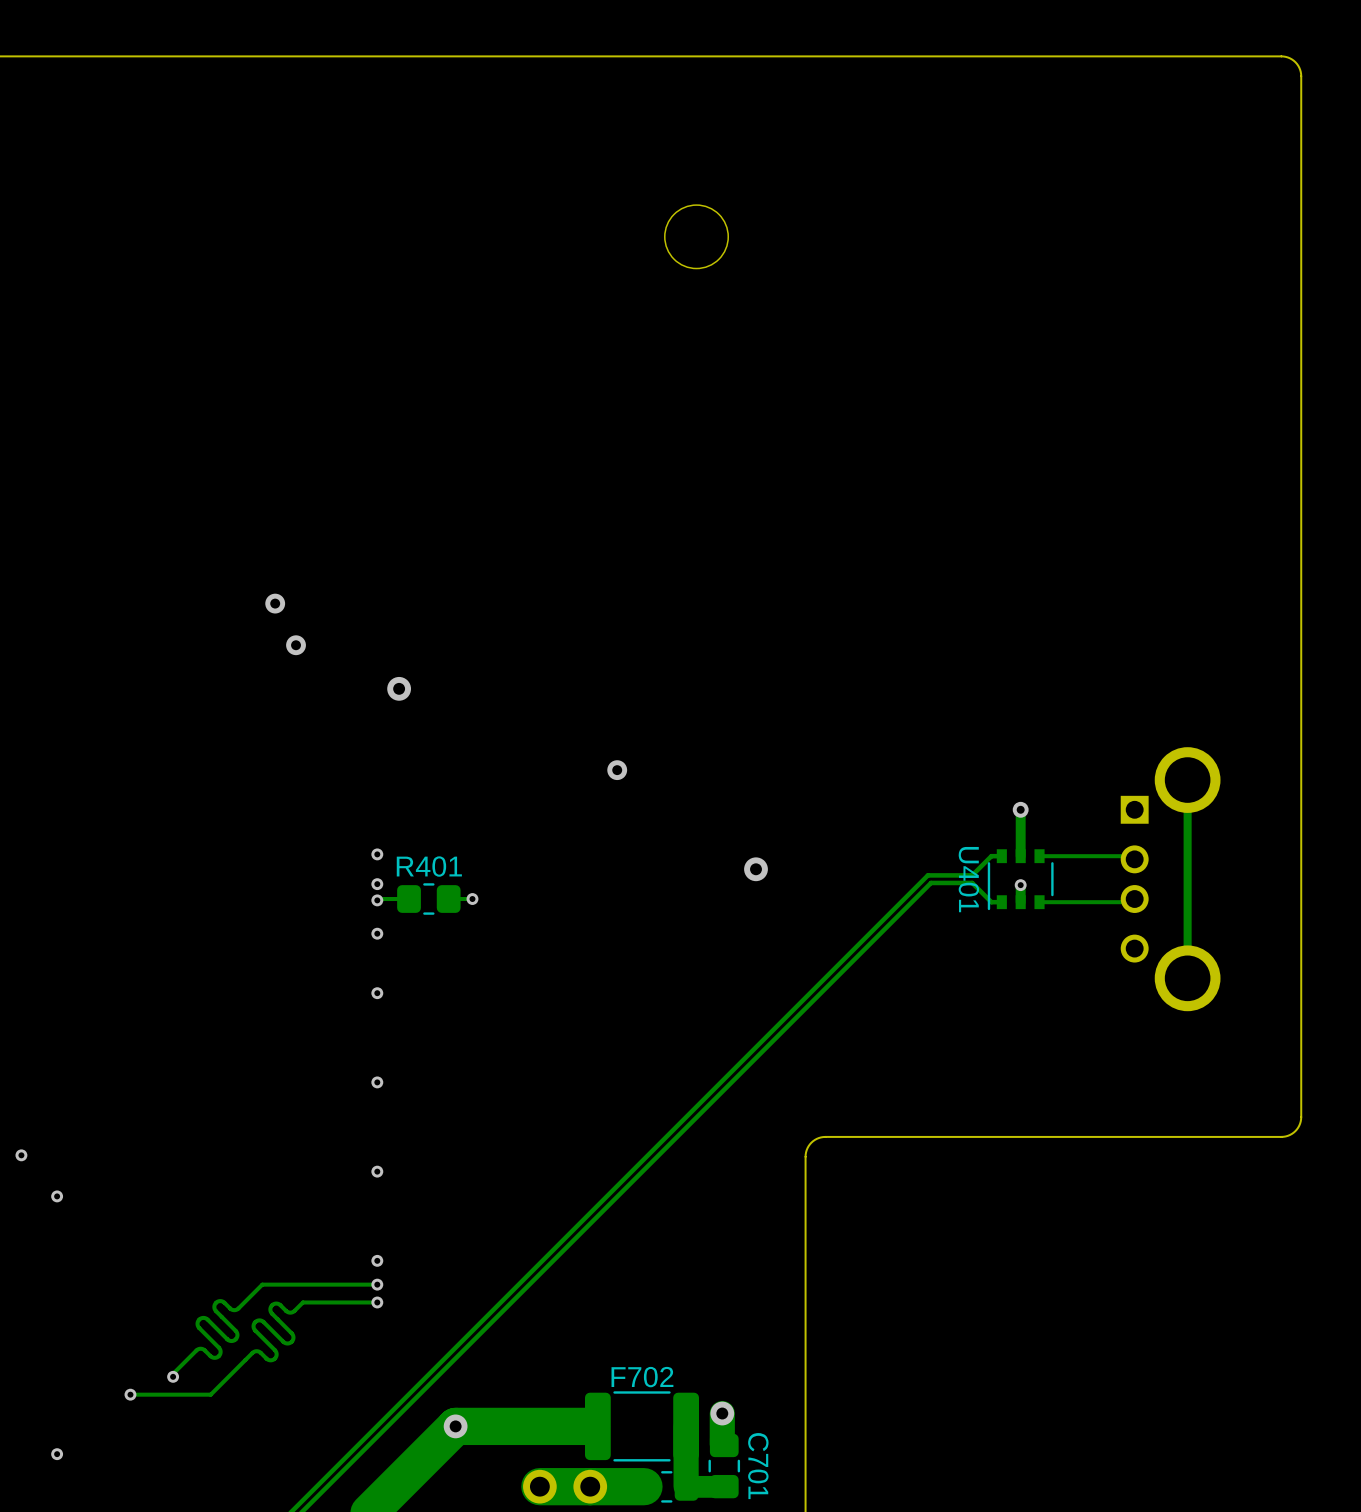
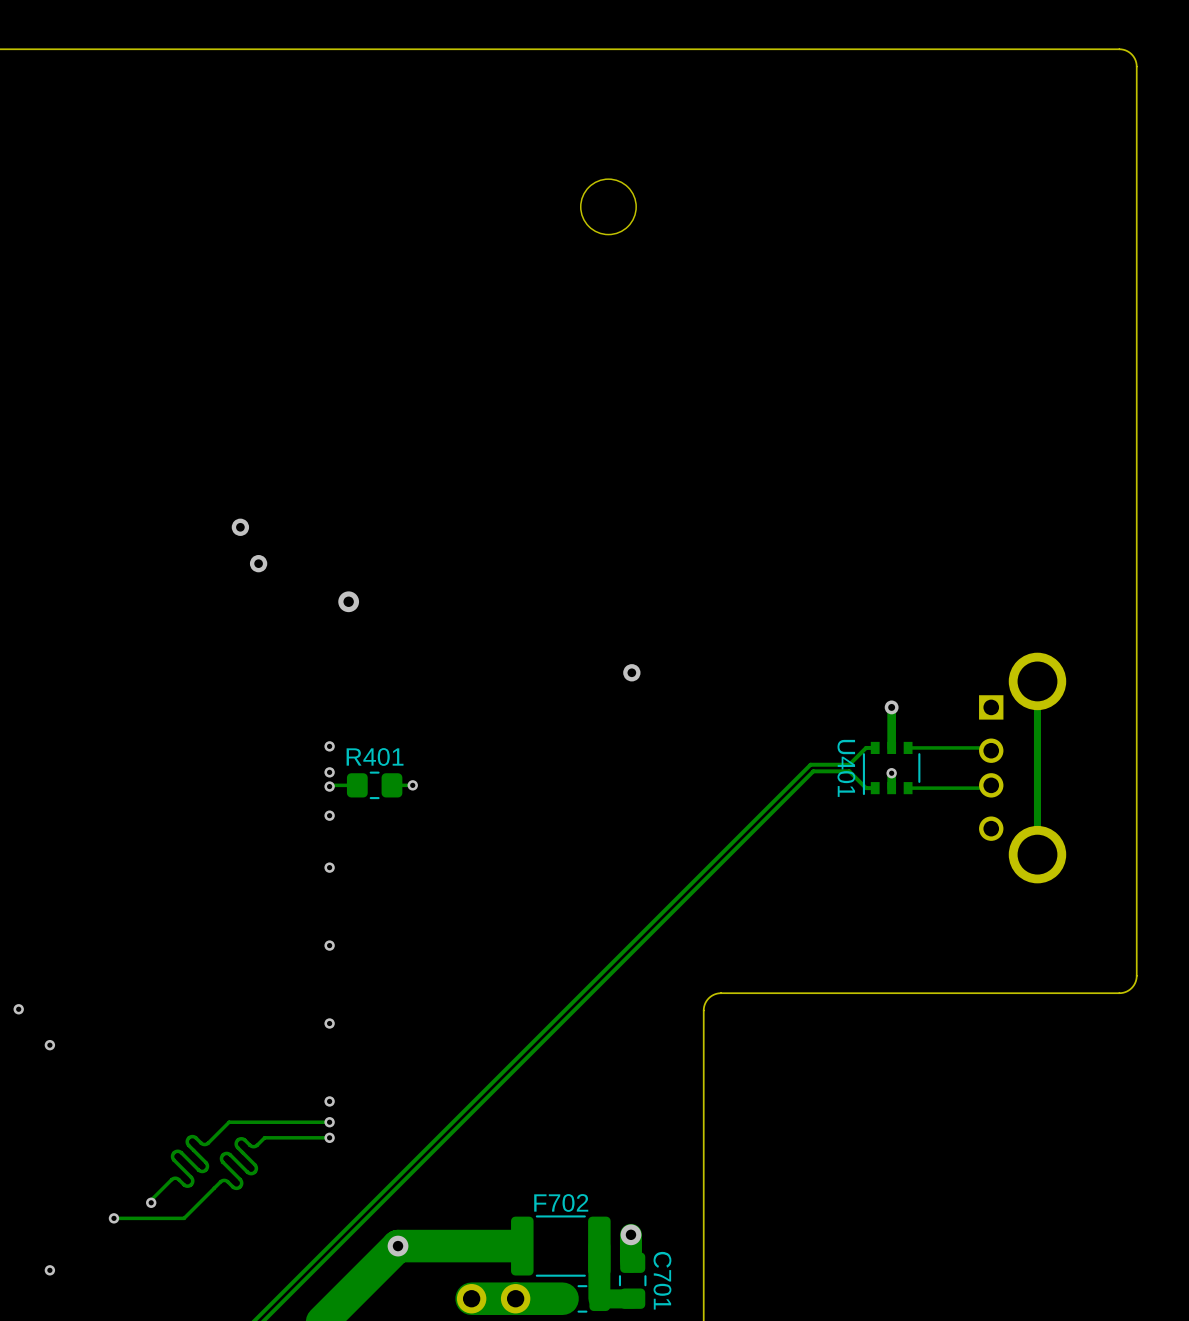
via position: (617, 770) -> (631, 672)
via: (756, 869) -> none

